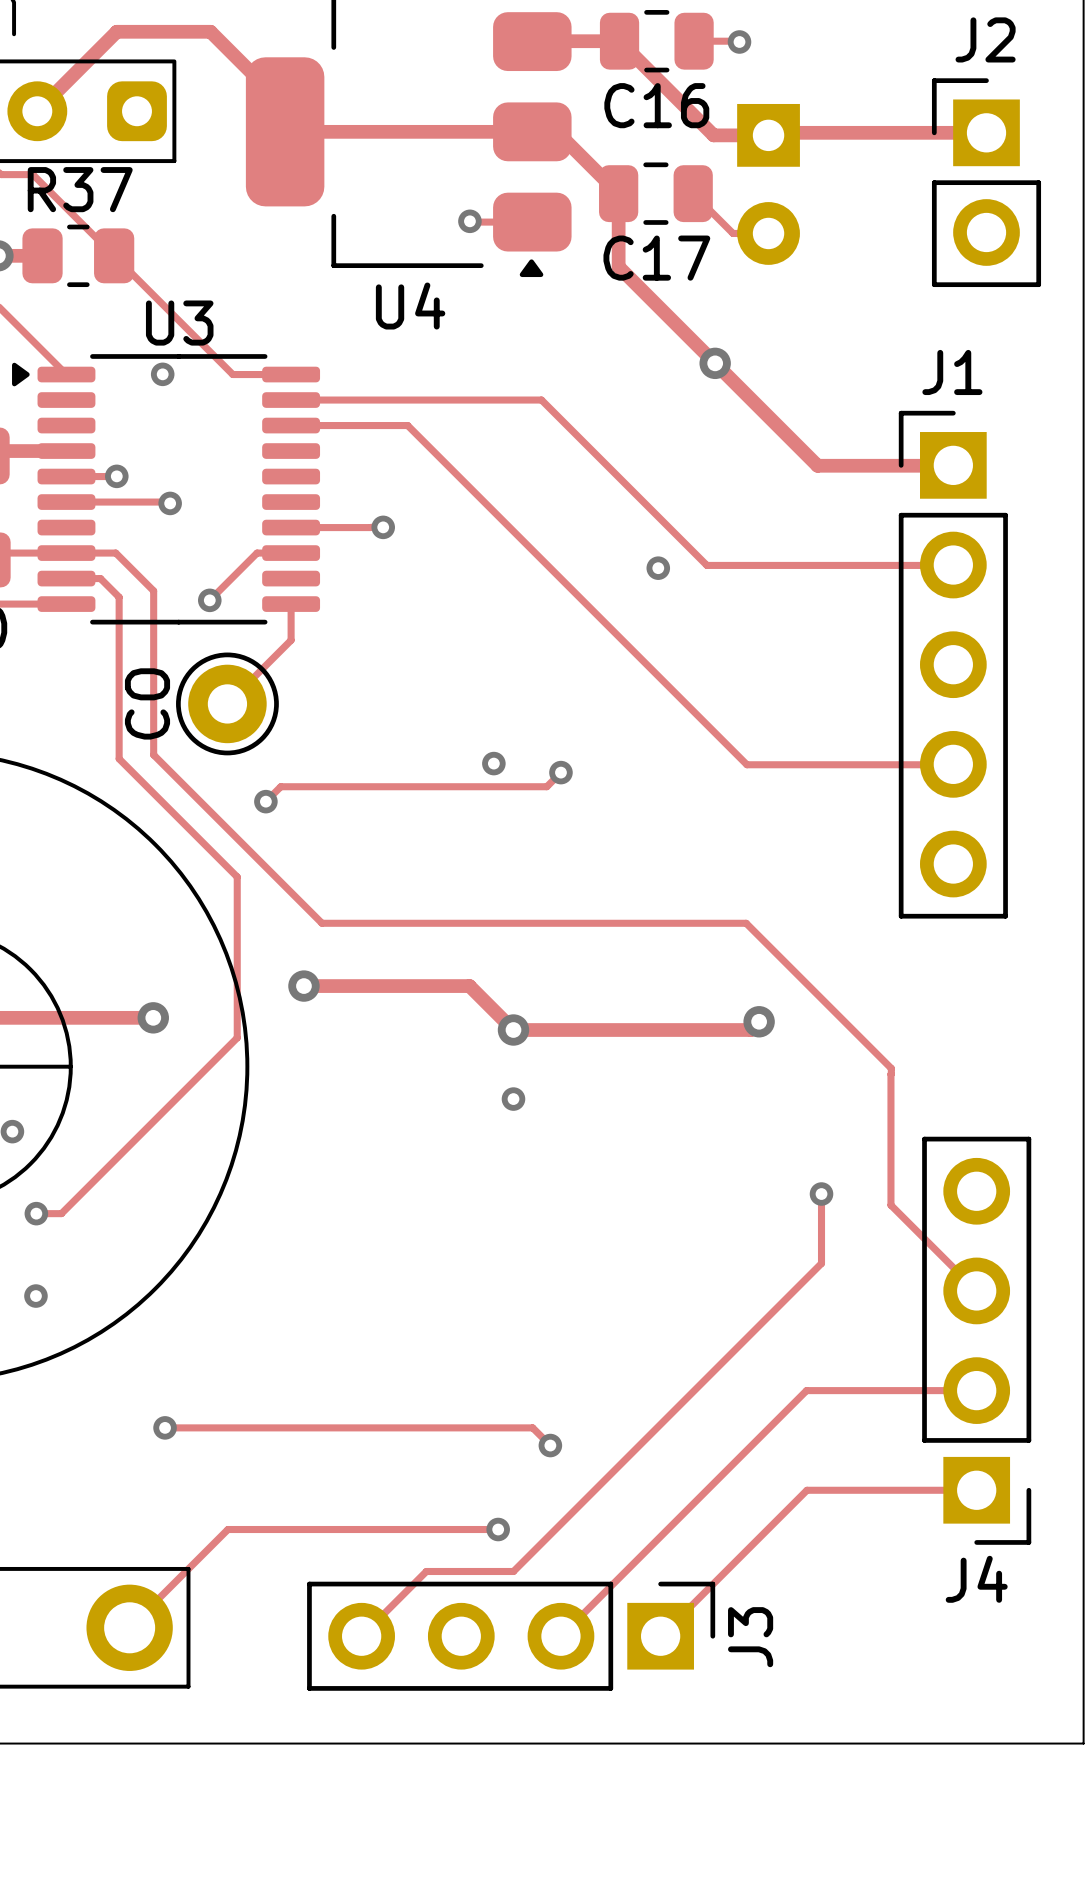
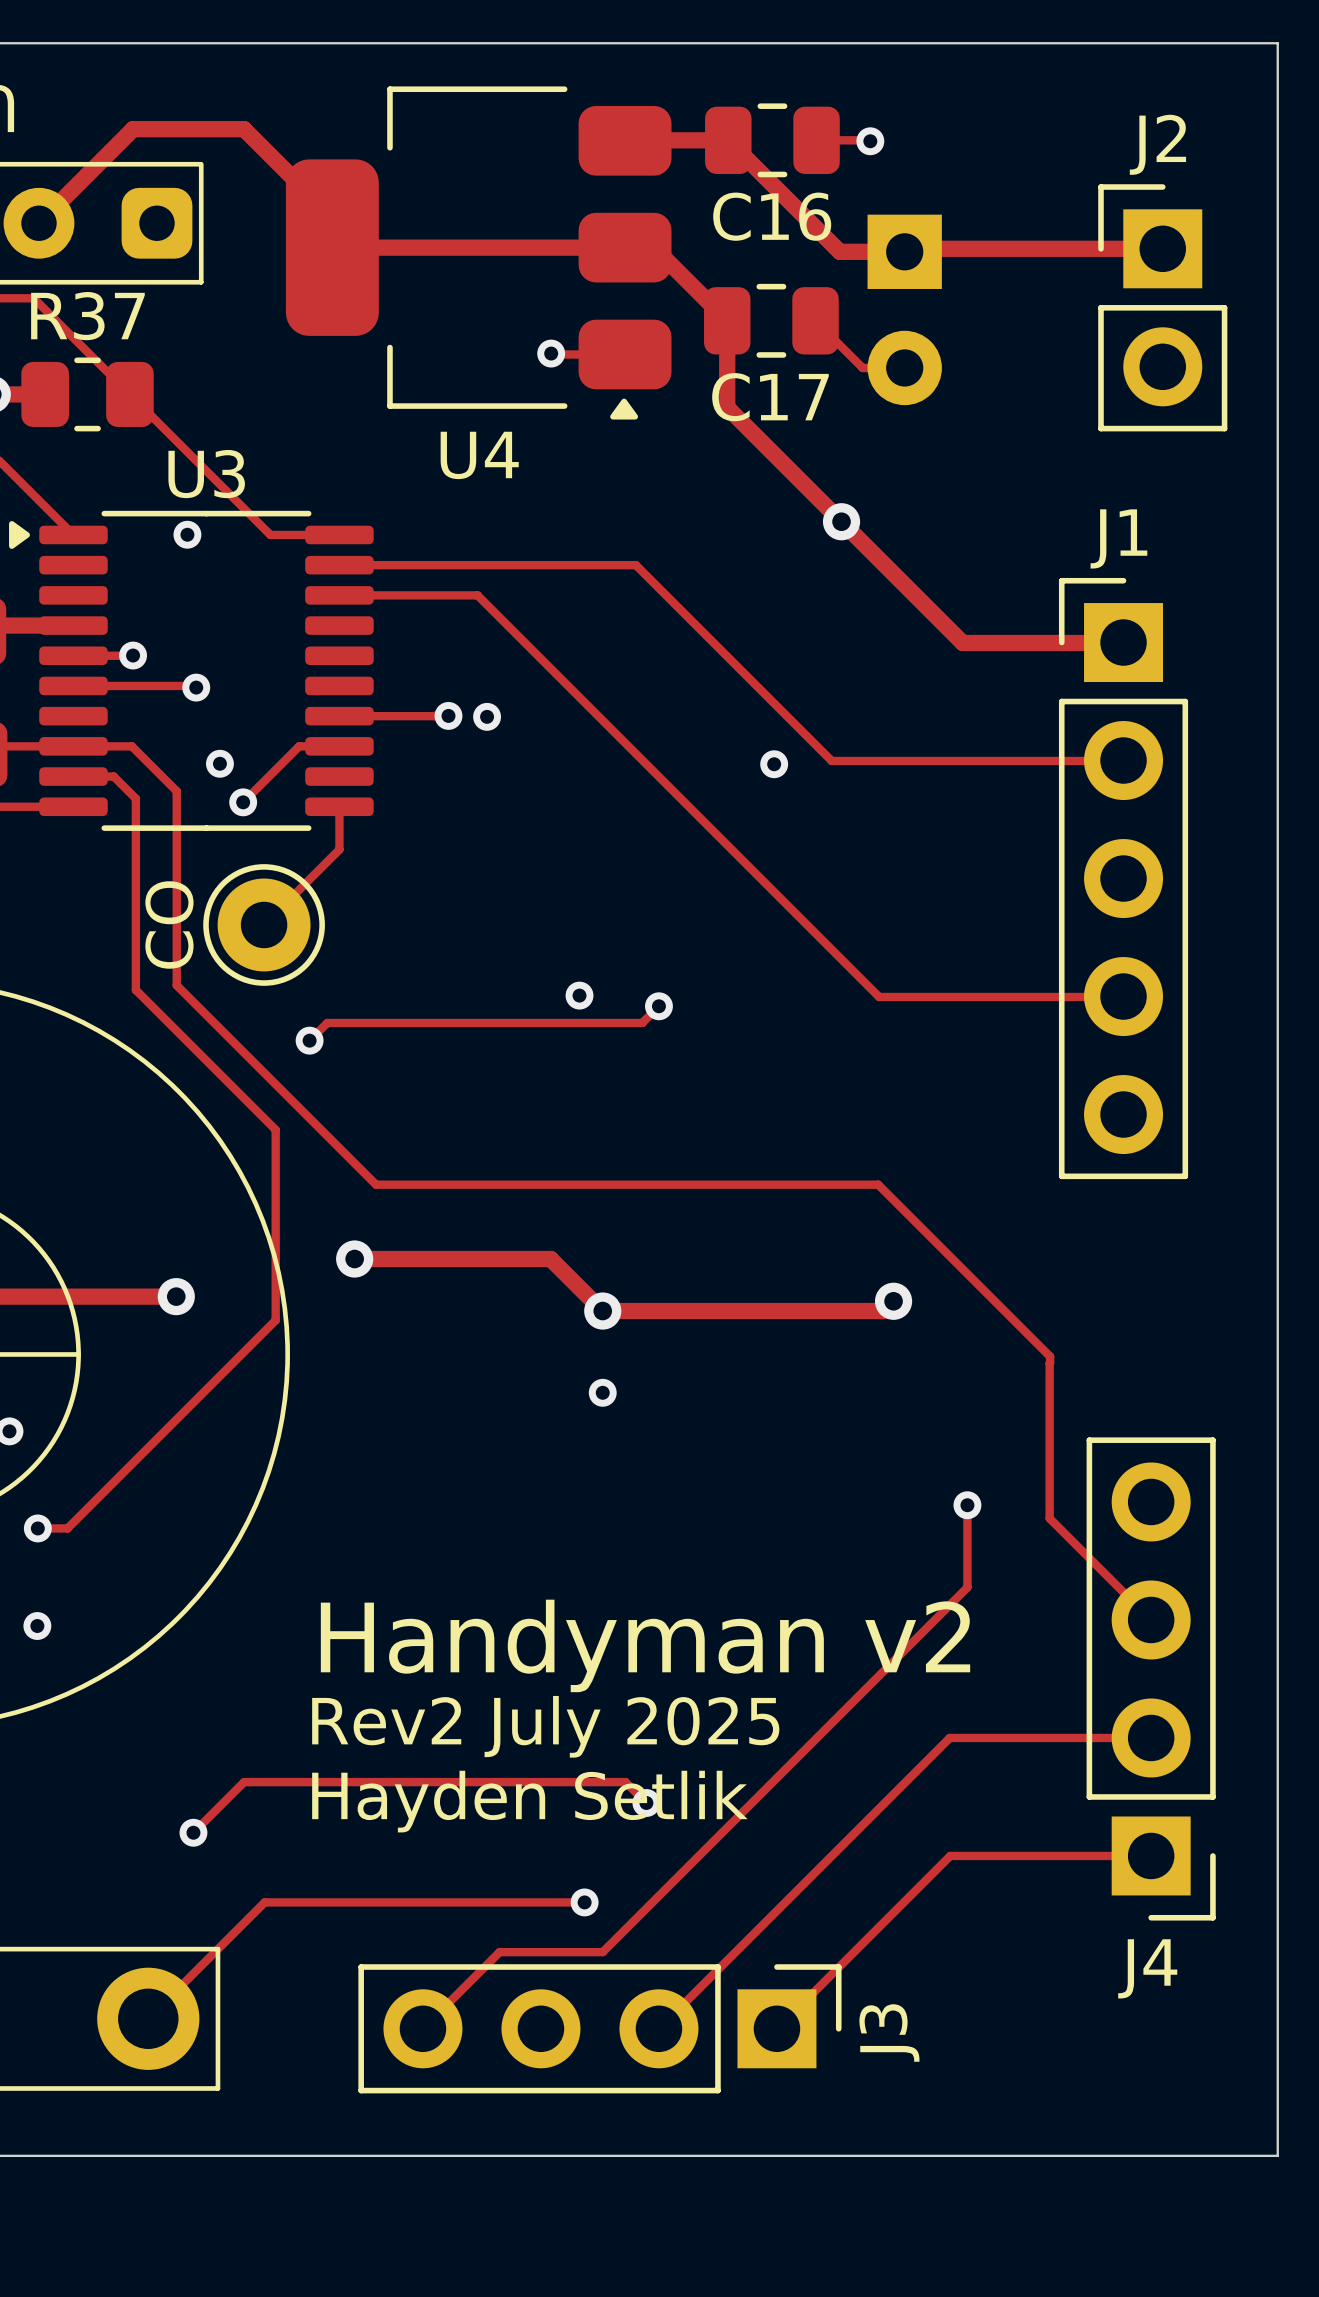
via: none -> (487, 716)
via: none -> (219, 763)
text: none -> Handyman v2 (645, 1645)
text: none -> Rev2 July 2025 (545, 1726)
track: (165, 1427) (210, 1427) -> (193, 1832) (244, 1782)
via position: (165, 1427) -> (193, 1832)
text: none -> Hayden Setlik (529, 1801)

